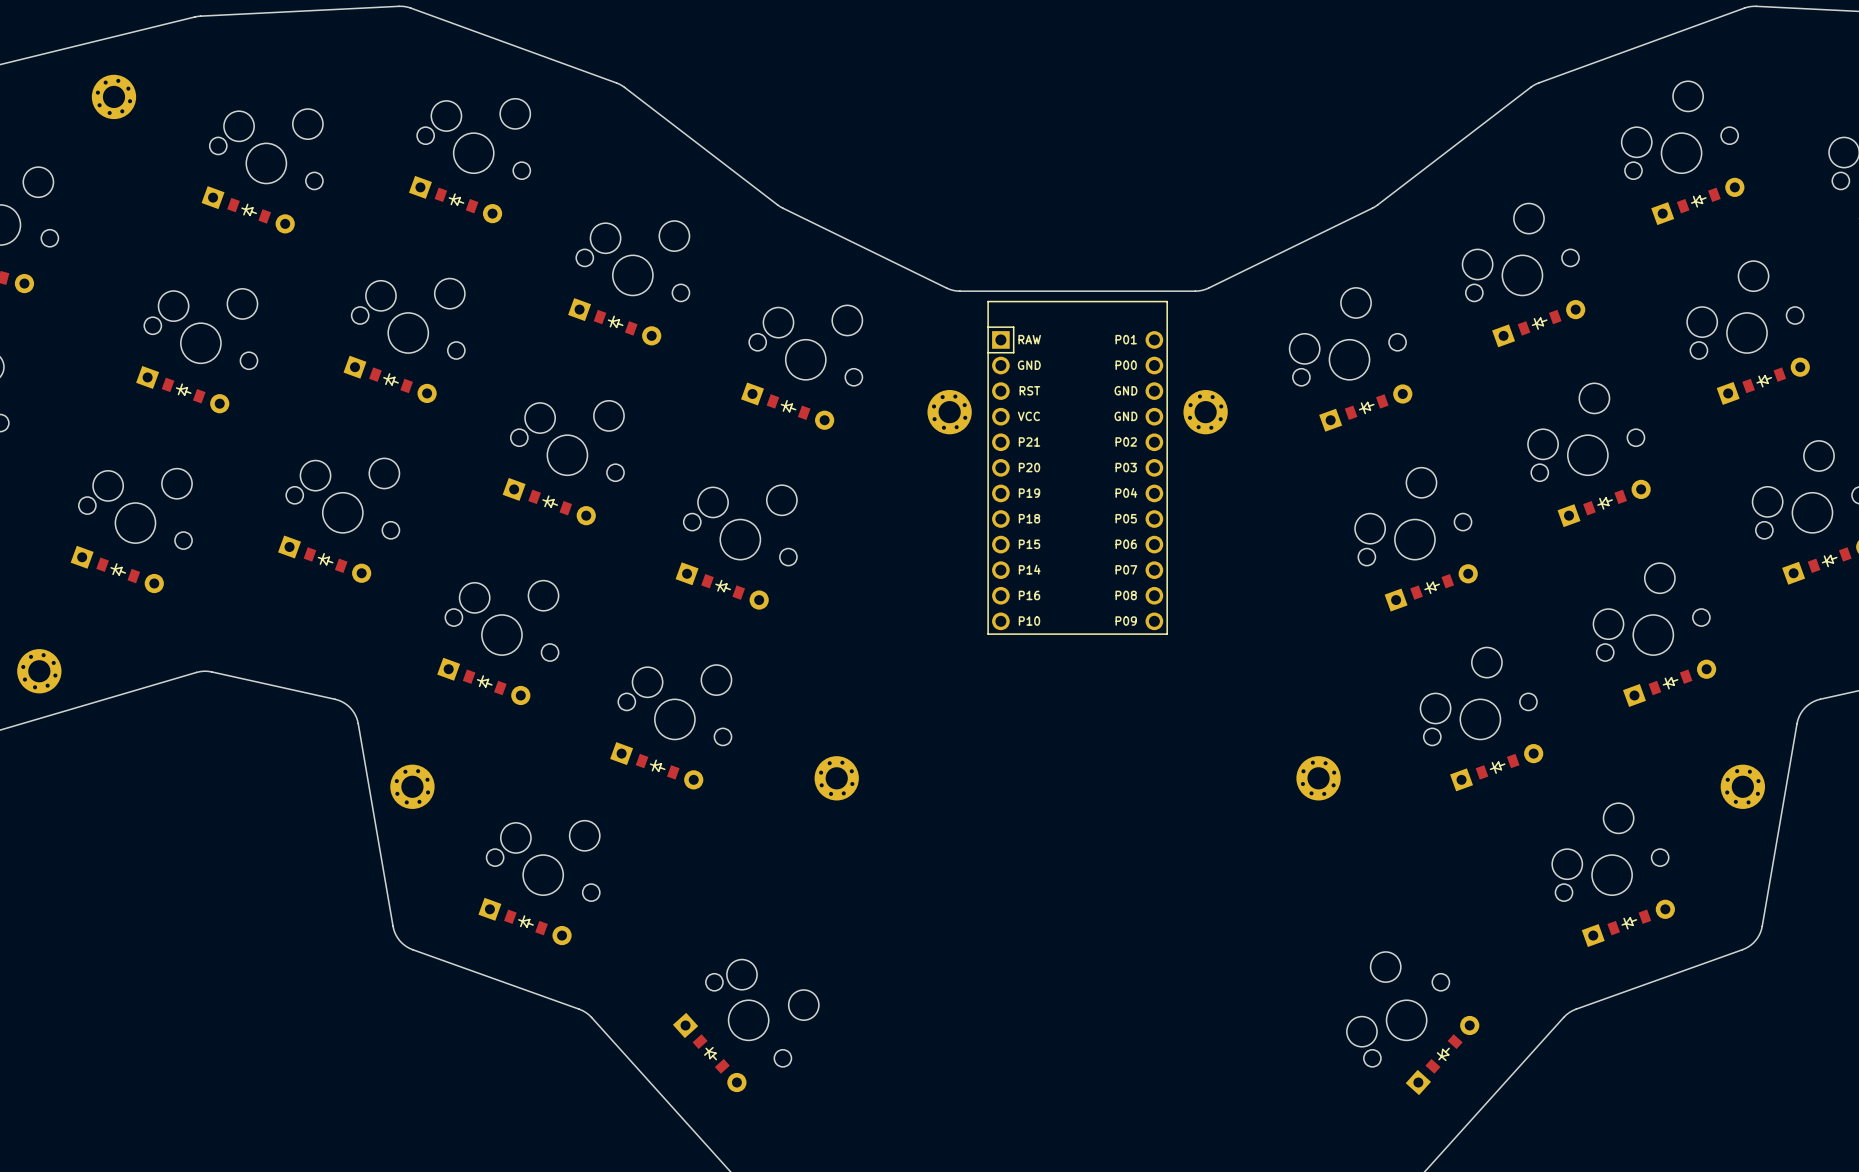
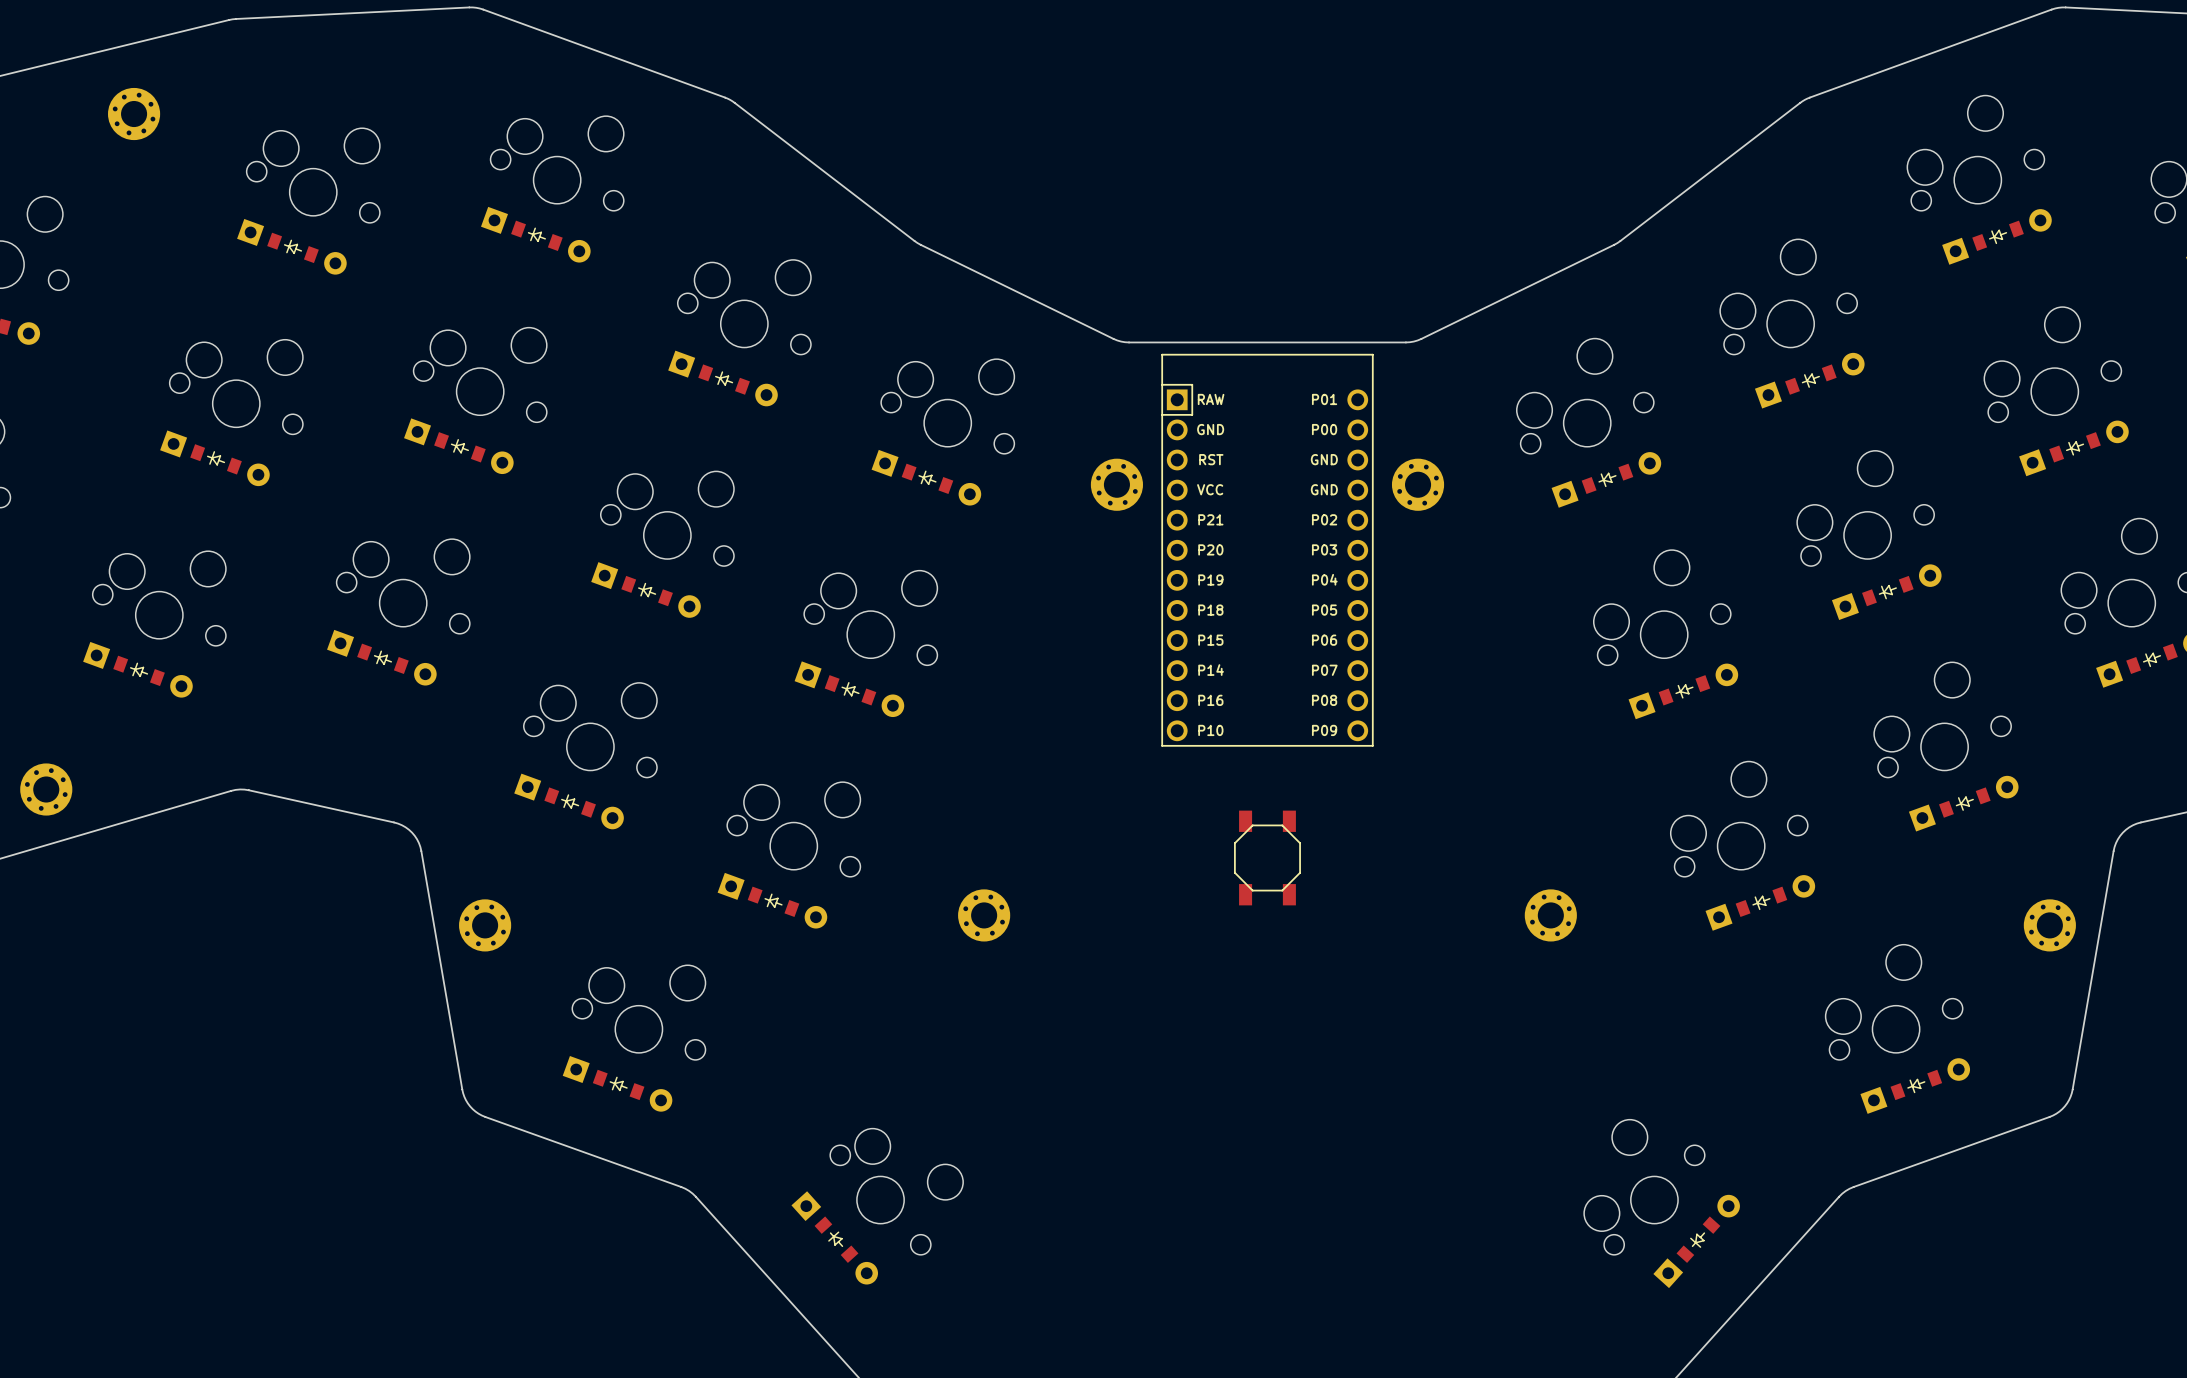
part: none -> (1267, 857)

